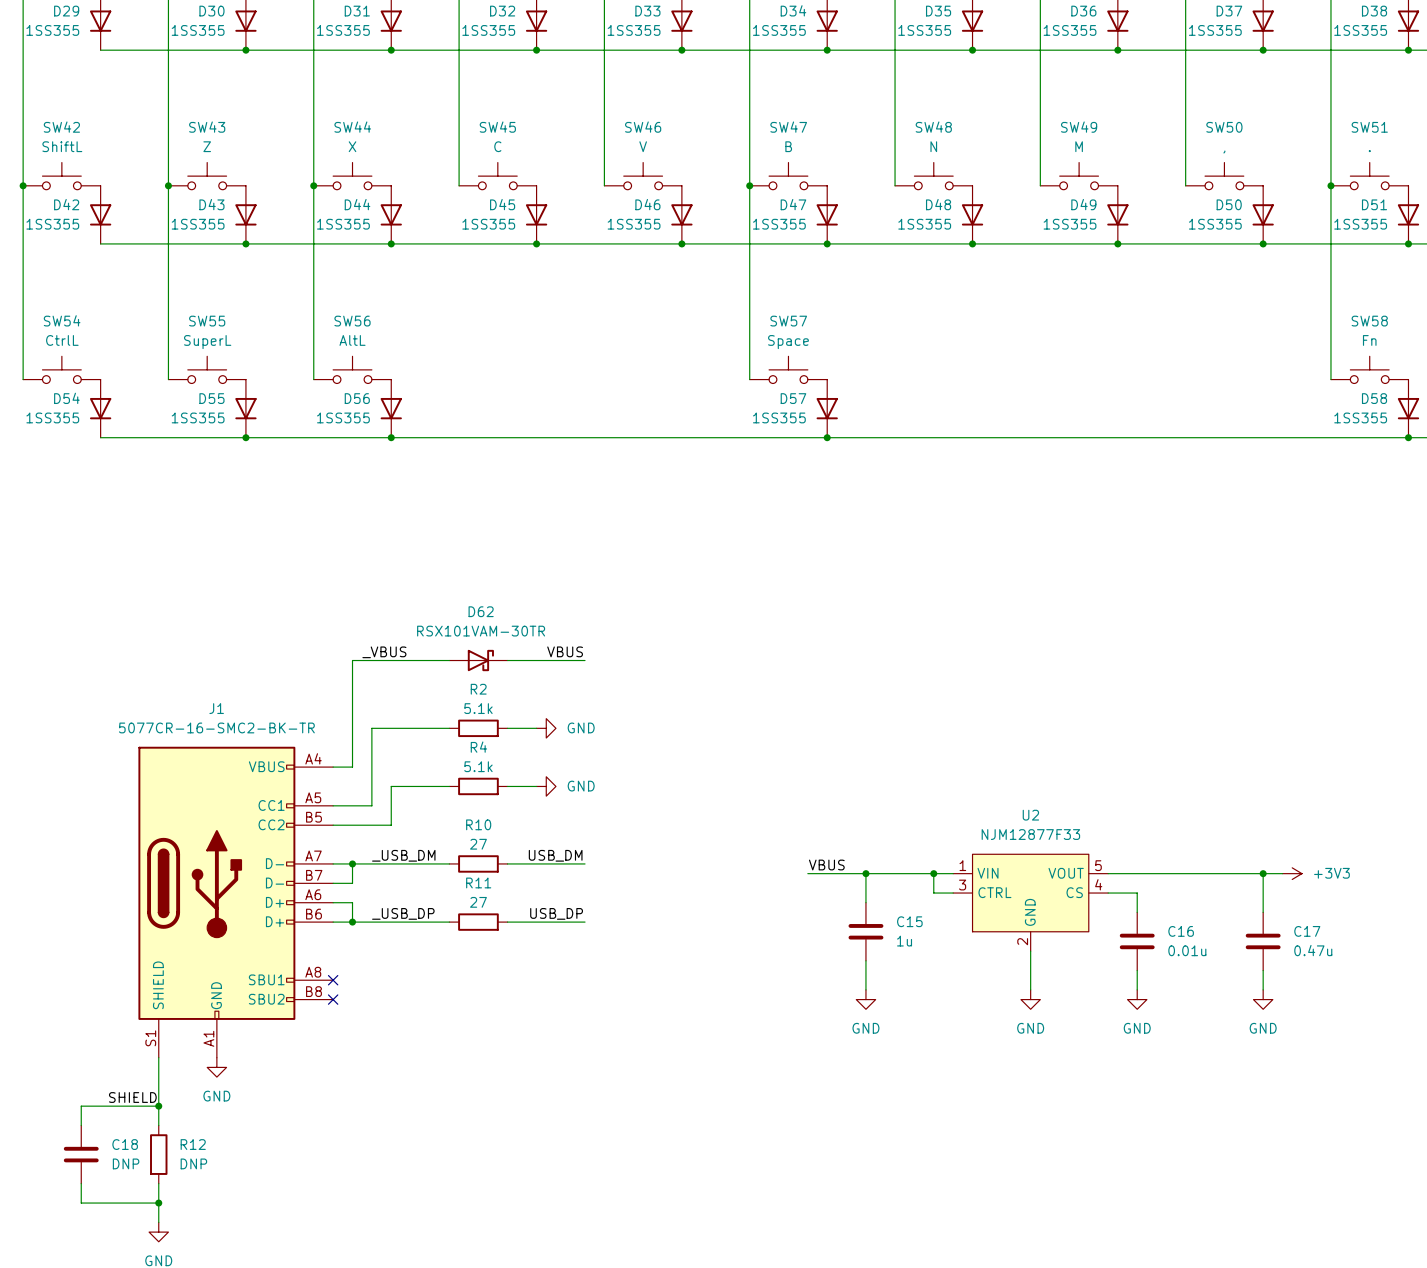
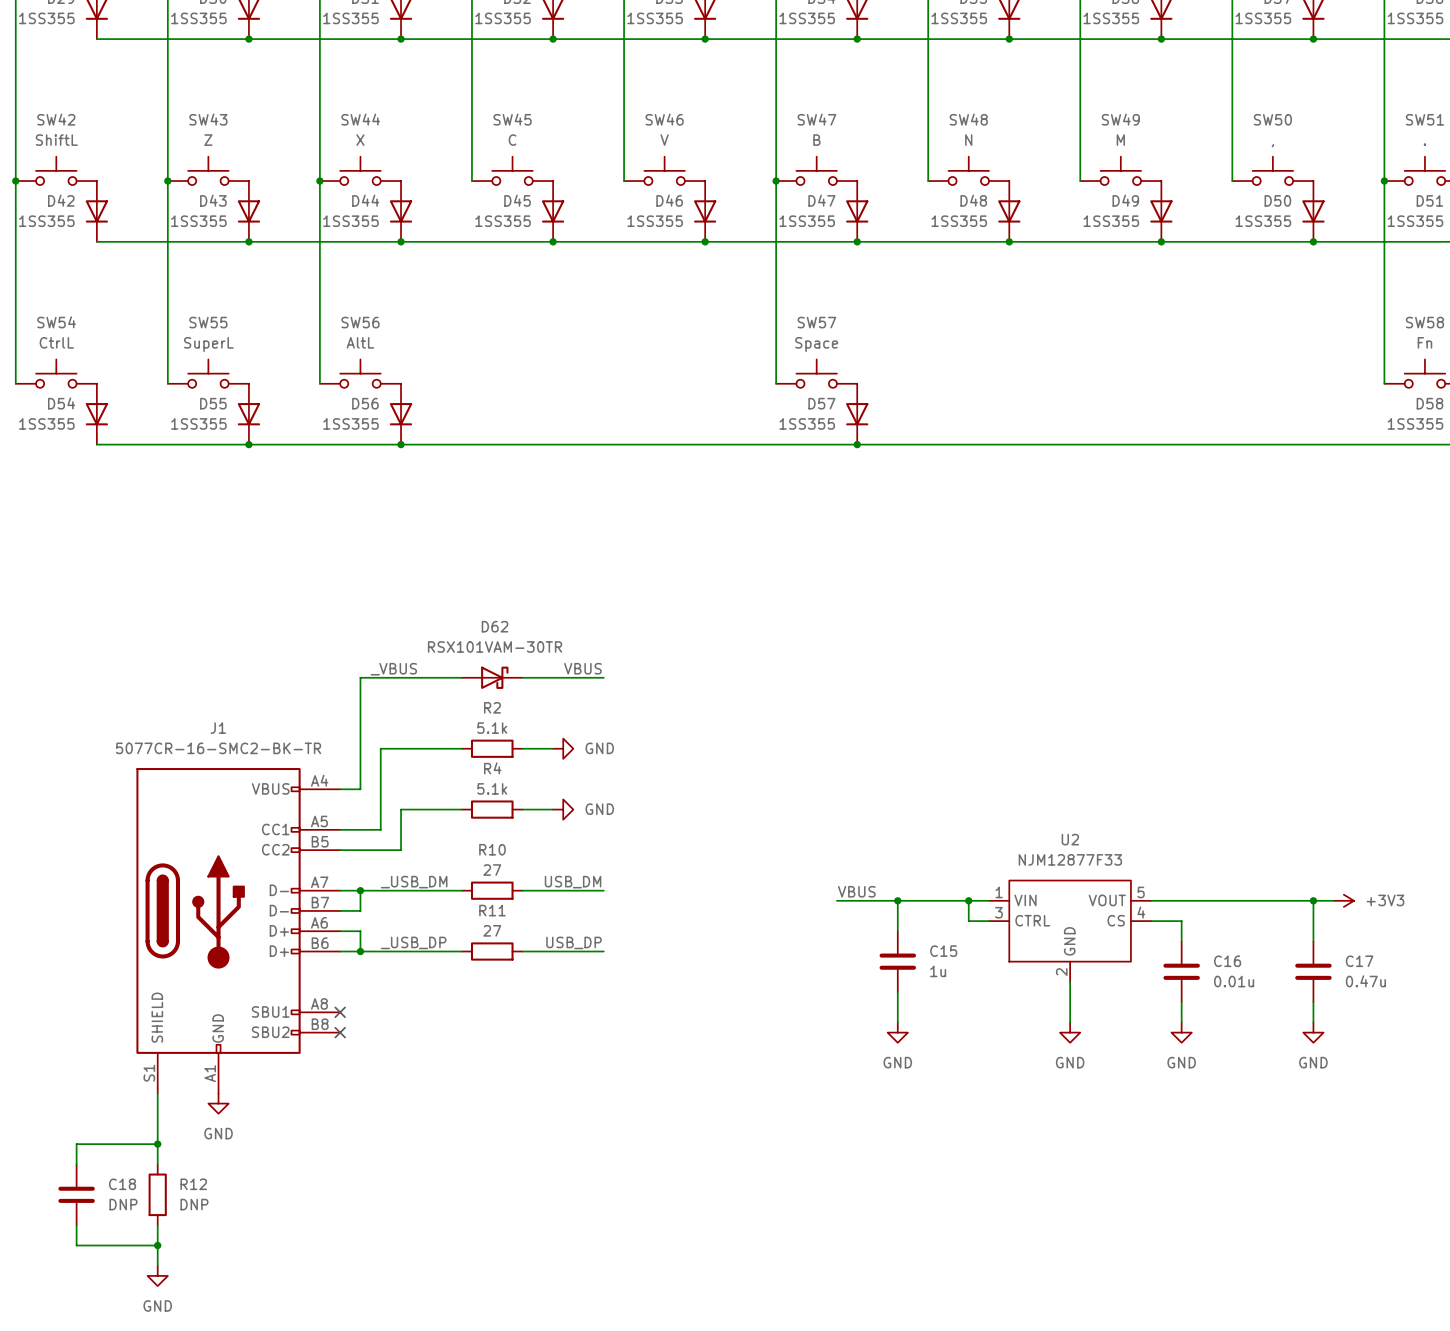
label: SHIELD (132, 1097) -> none

